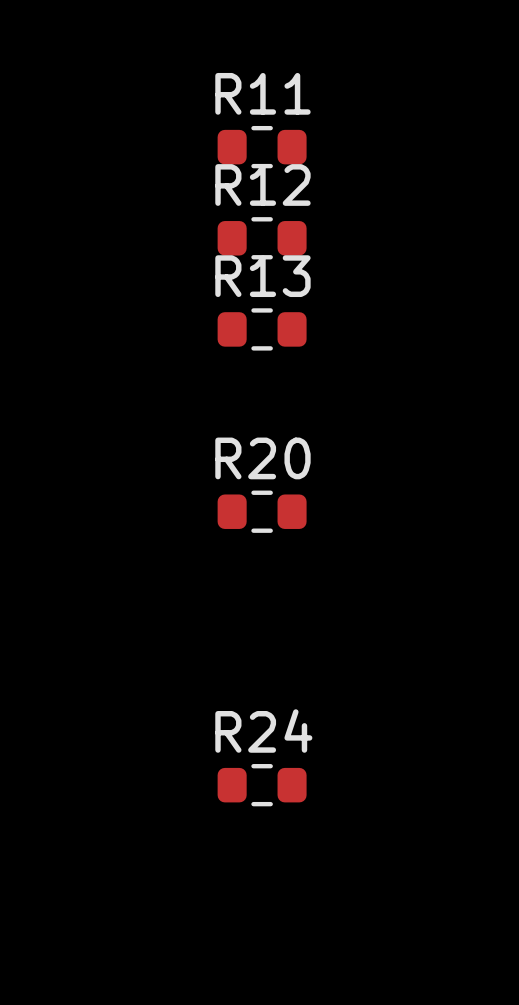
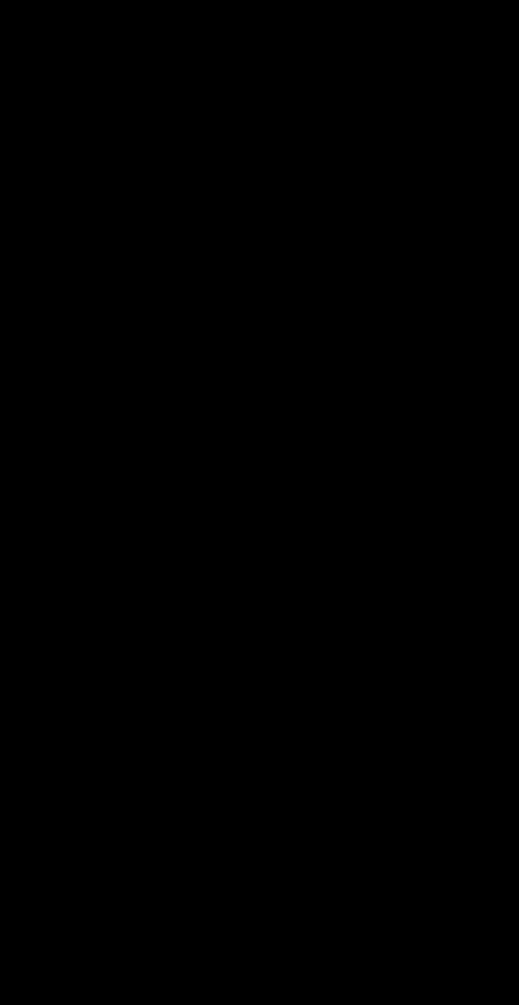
R11: (262, 147) -> none
R12: (262, 238) -> none
R13: (262, 329) -> none
R20: (262, 511) -> none
R24: (262, 785) -> none

